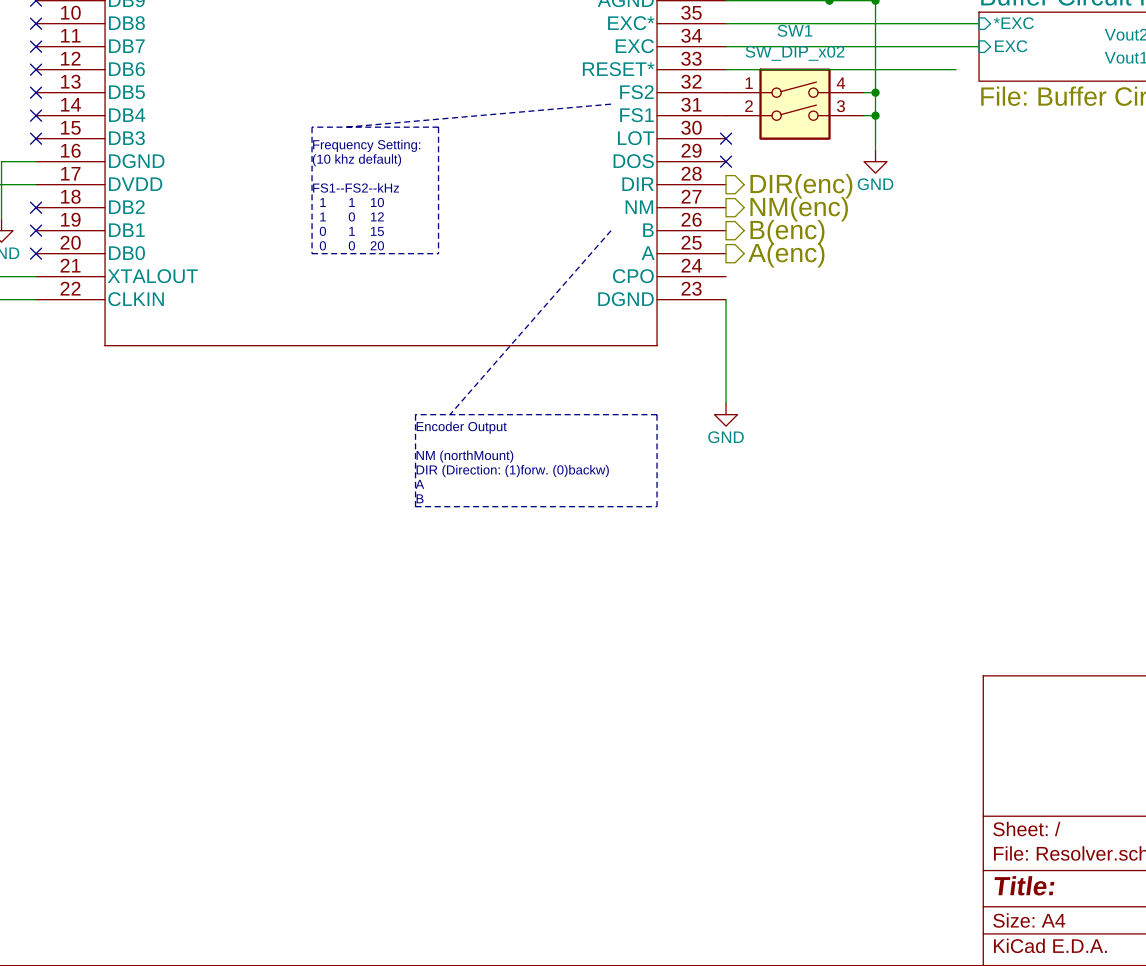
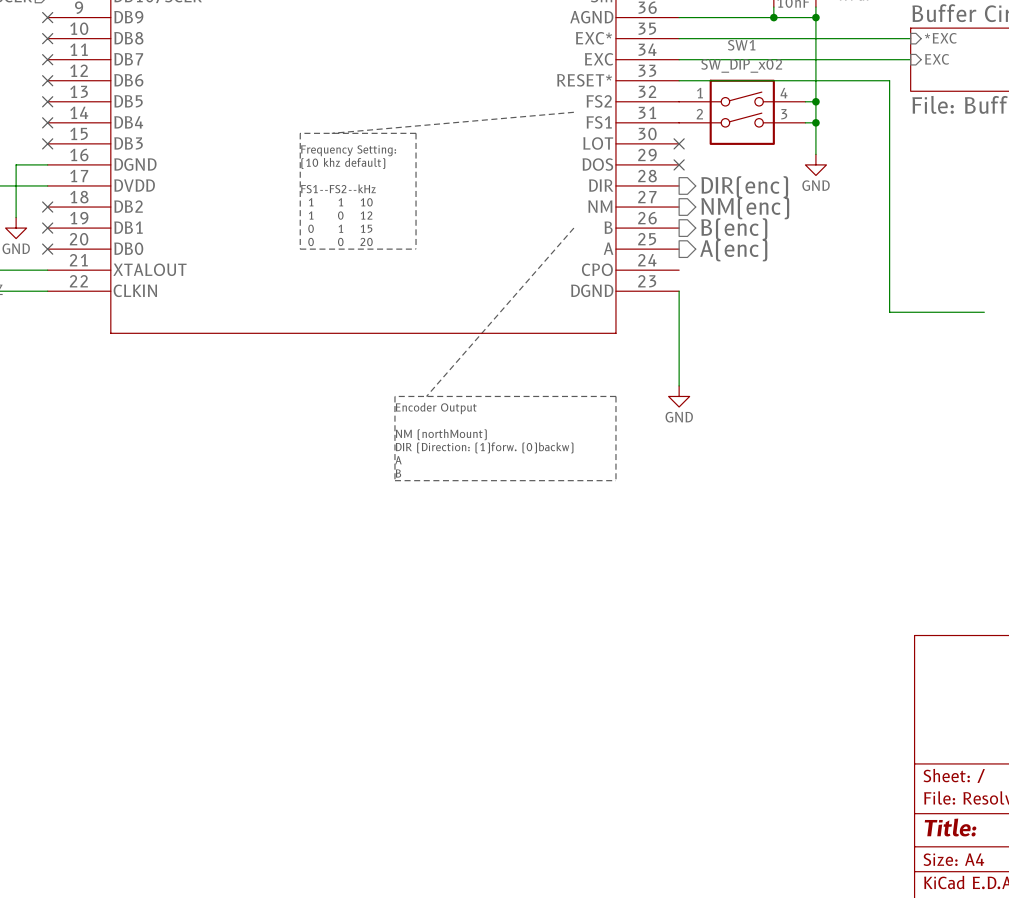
wire: none -> (889, 80) (889, 312) (984, 312)

